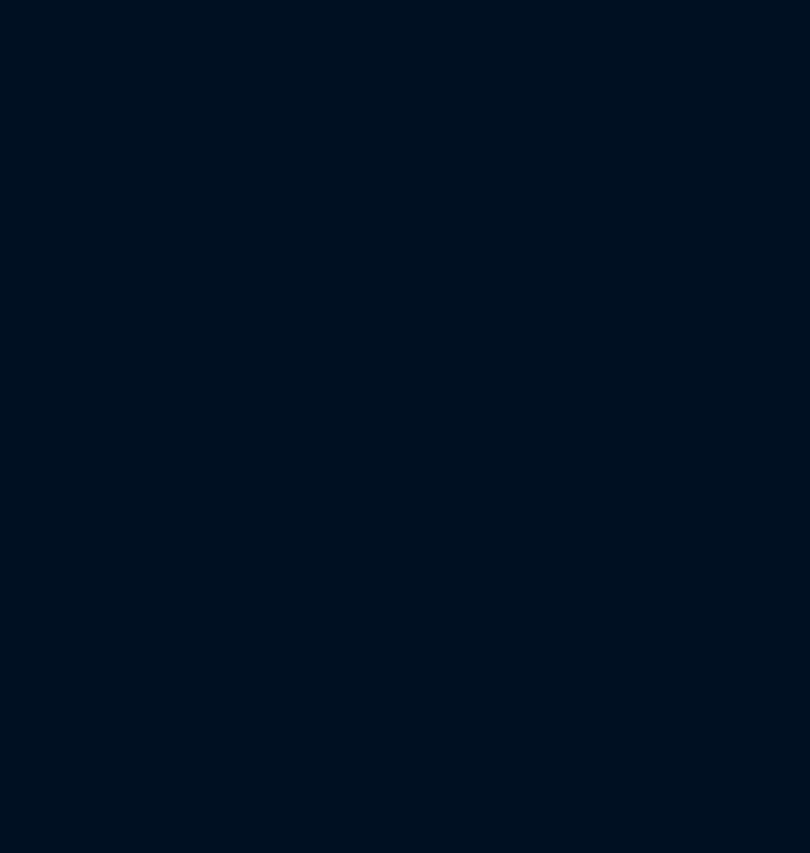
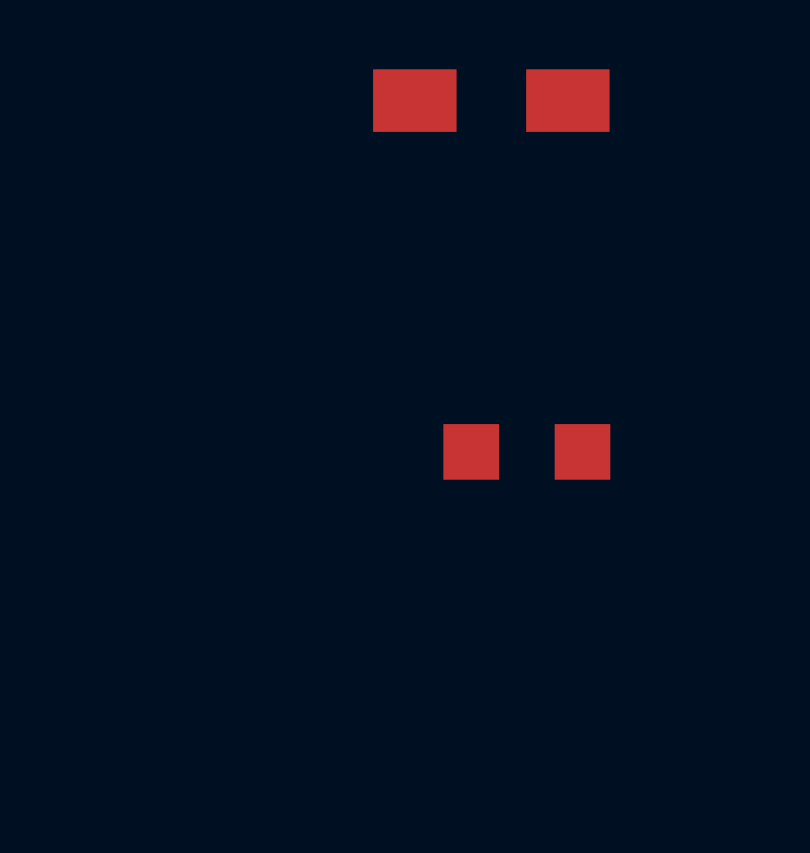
part: none -> (491, 100)
part: none -> (526, 451)

